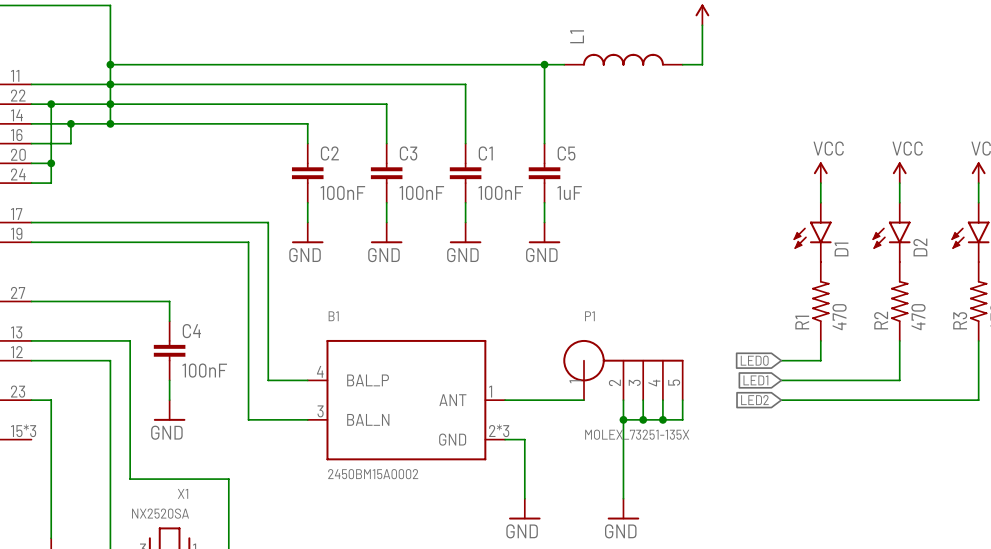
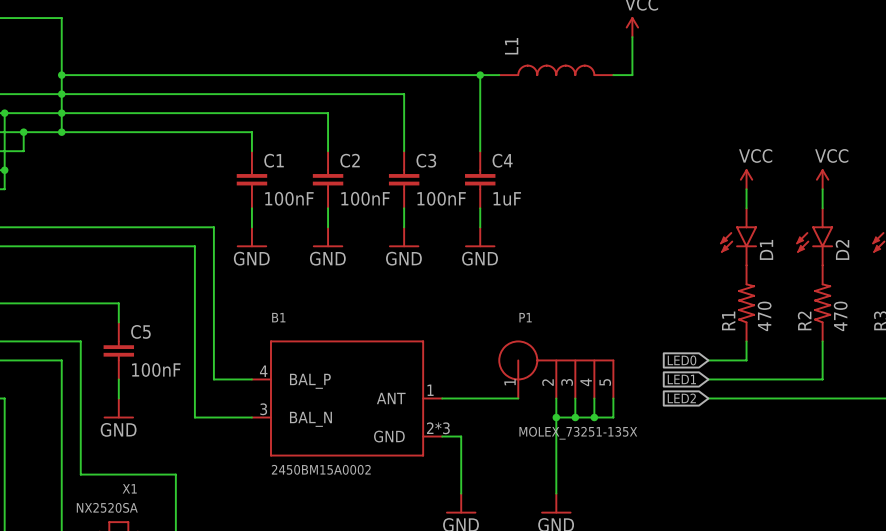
C2 name: C2 (329, 153) -> C1 (274, 160)
C3 name: C3 (408, 153) -> C2 (350, 160)
C1 name: C1 (485, 153) -> C3 (426, 160)
C5 name: C5 (566, 153) -> C4 (502, 160)
C4 name: C4 (191, 331) -> C5 (140, 331)

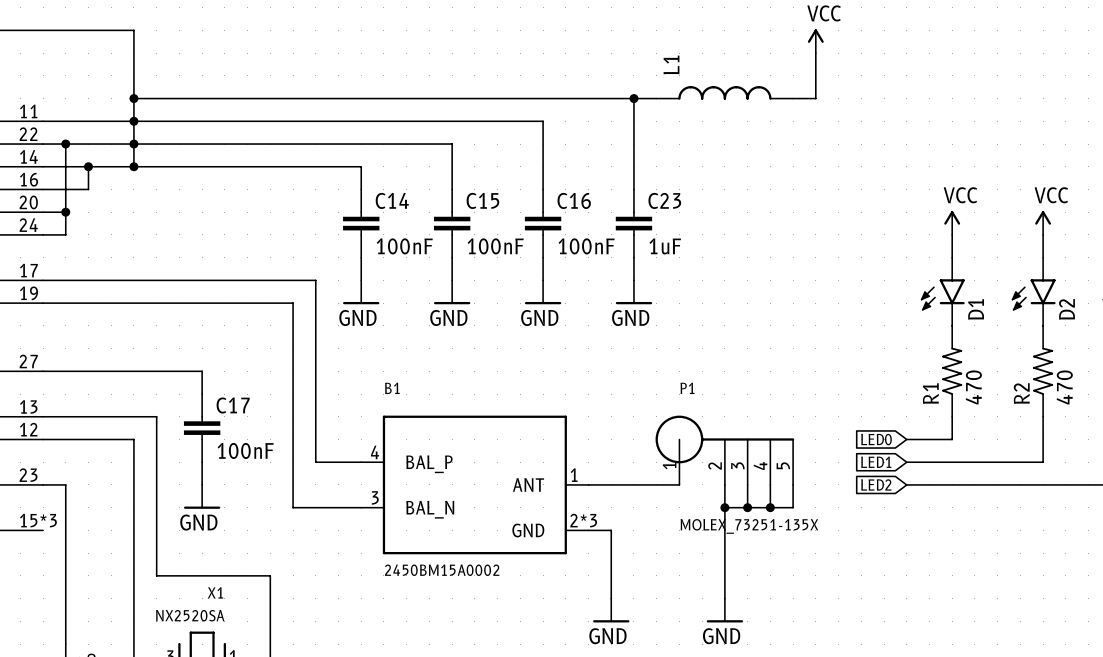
C1 name: C1 (274, 160) -> C14 (392, 200)
C2 name: C2 (350, 160) -> C15 (482, 200)
C3 name: C3 (426, 160) -> C16 (574, 200)
C4 name: C4 (502, 160) -> C23 (664, 200)
C5 name: C5 (140, 331) -> C17 (233, 405)

